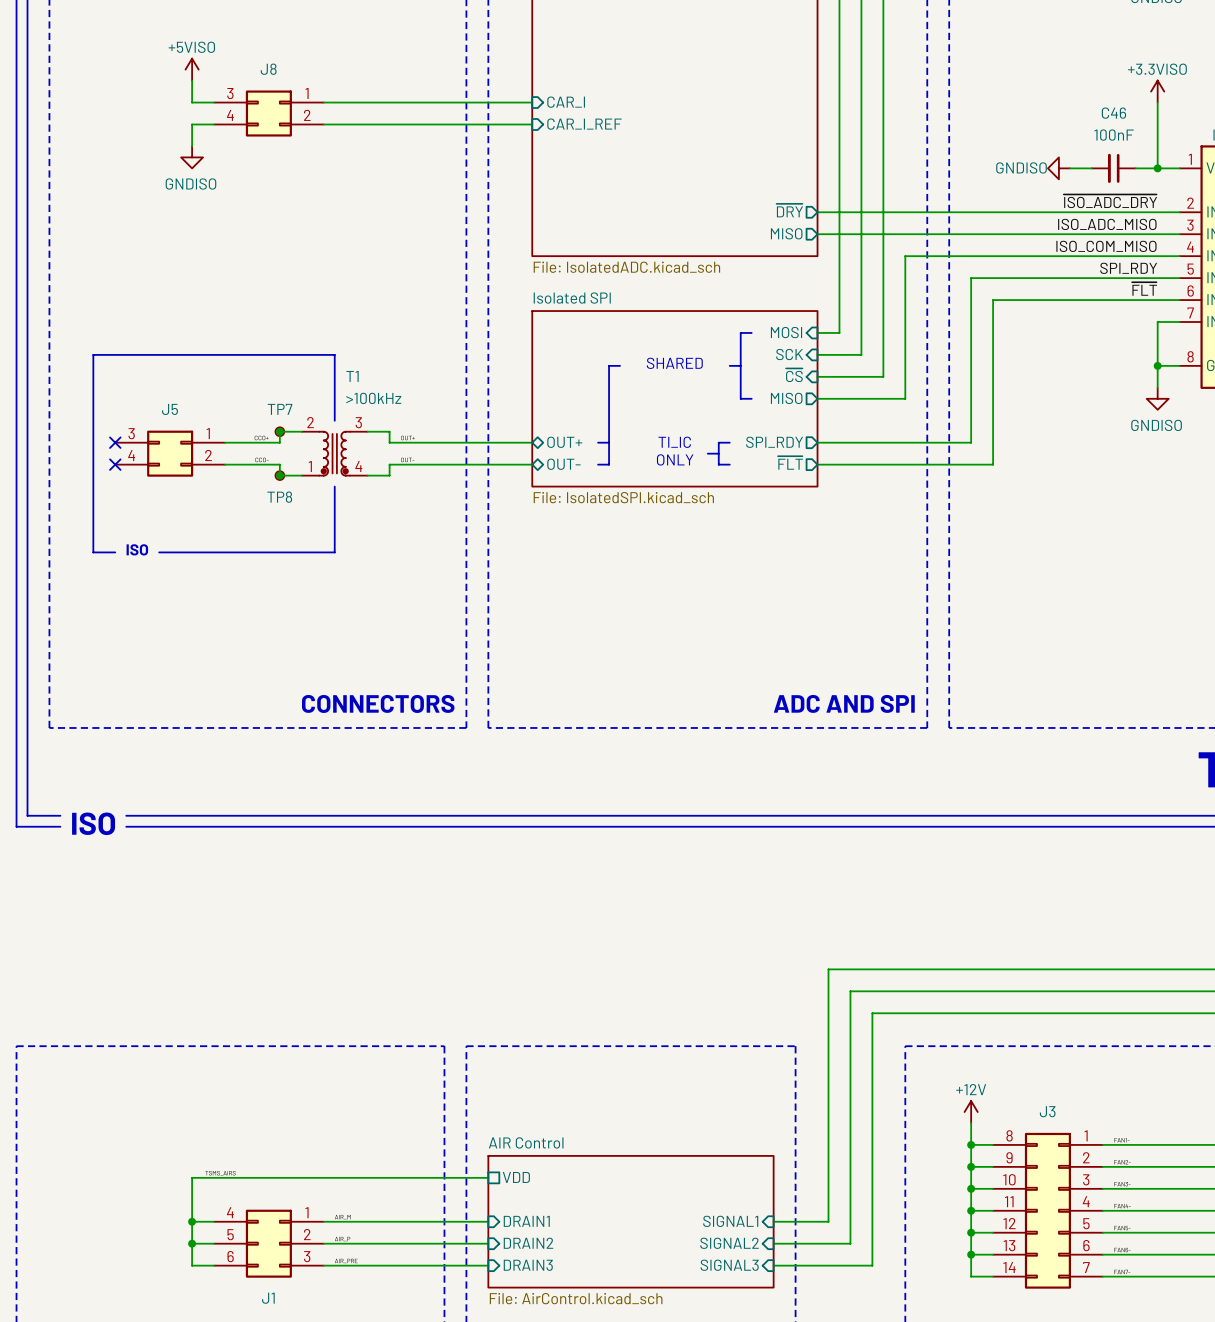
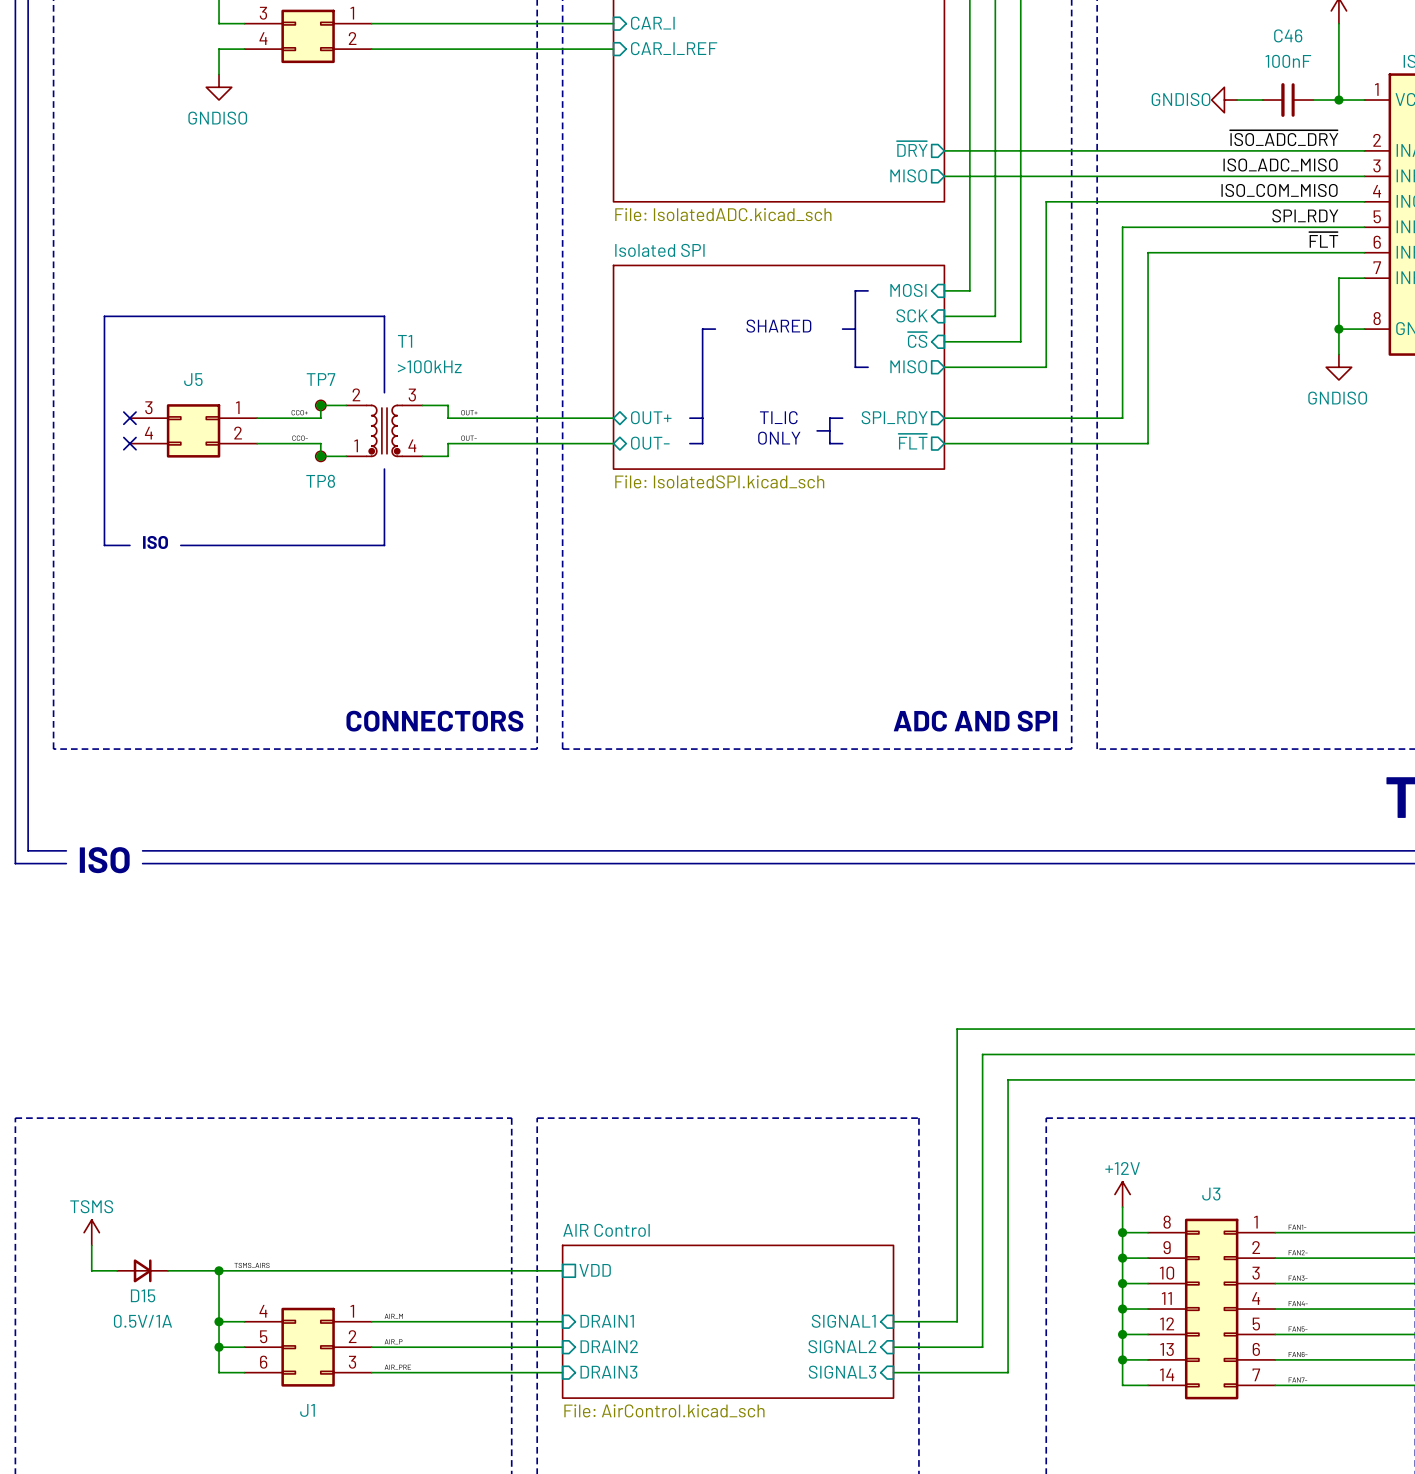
power symbol: none -> TSMS (91, 1232)
wire: none -> (91, 1245) (91, 1270) (117, 1270)
D15: none -> 0.5V/1A (142, 1270)
wire: none -> (168, 1270) (219, 1270)
junction: none -> (219, 1270)

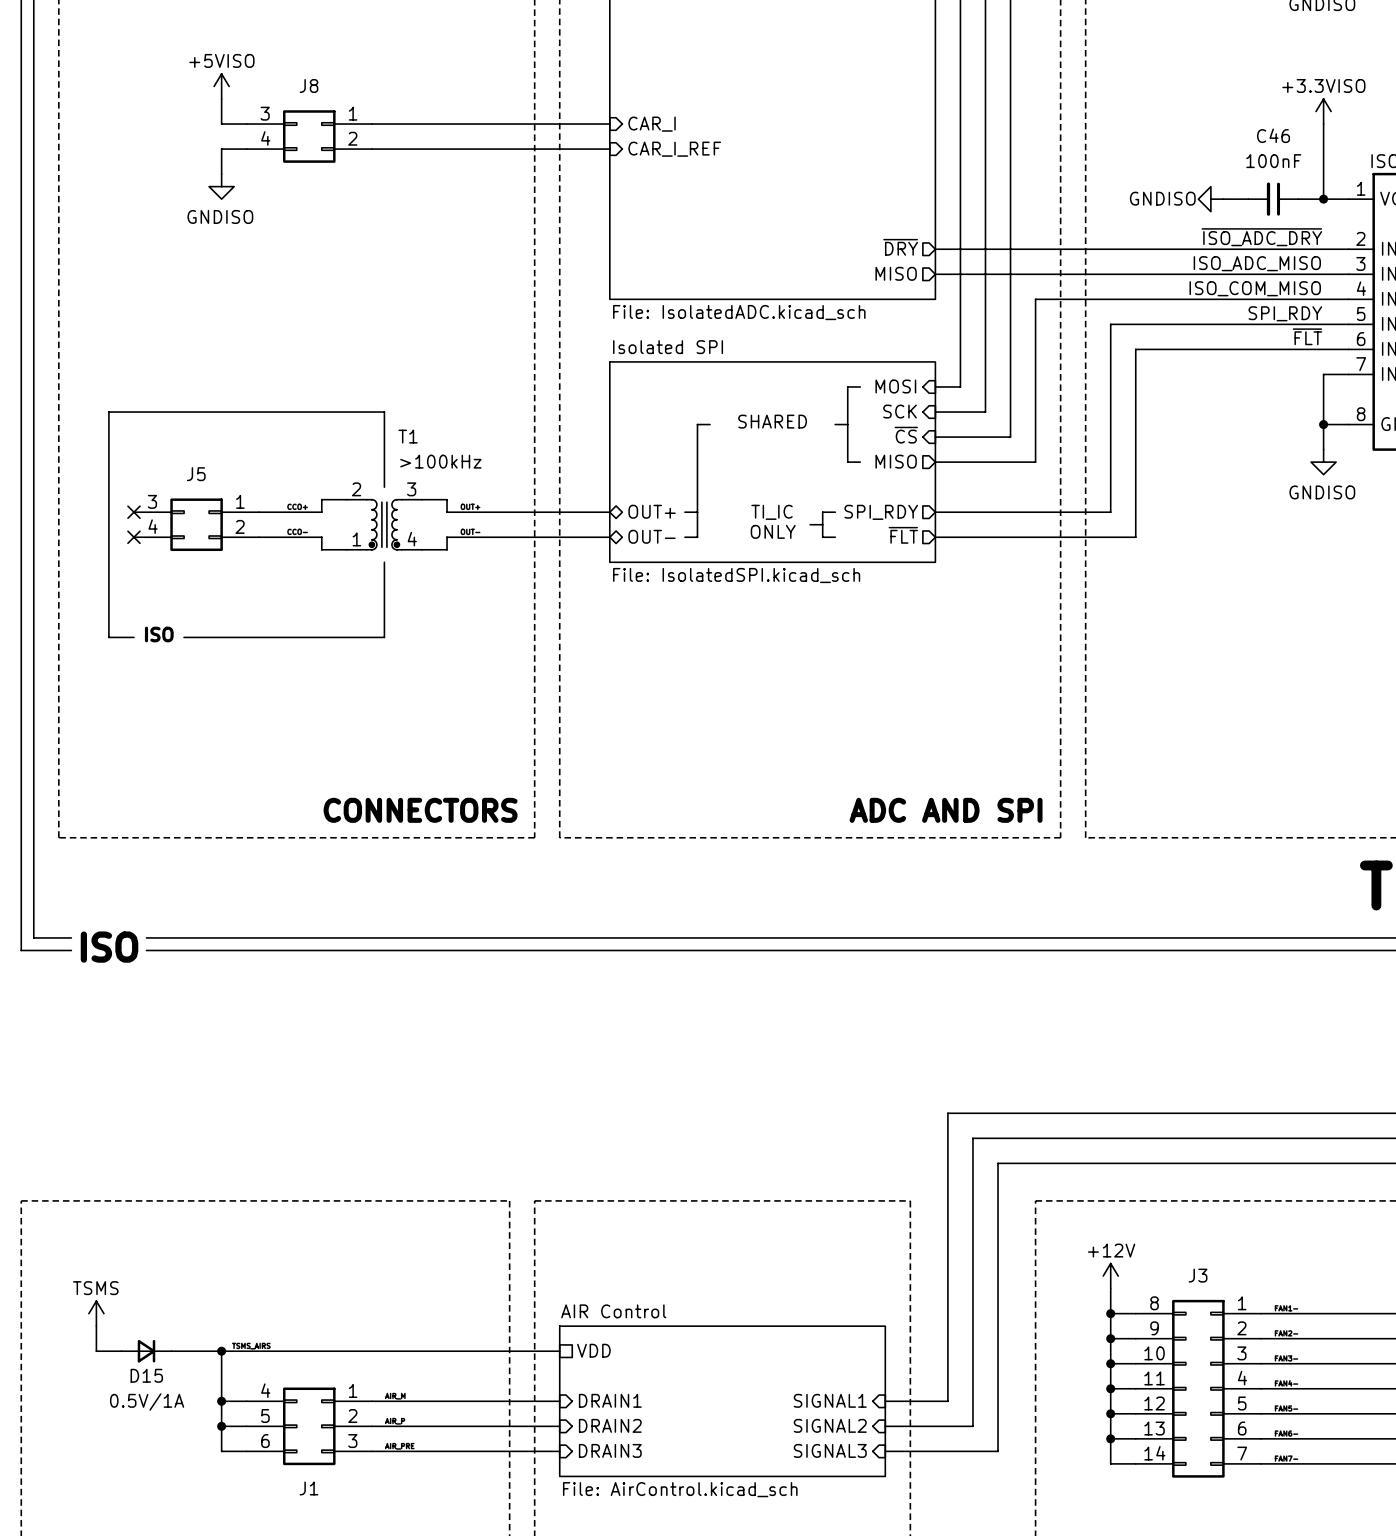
junction: (320, 405) -> none
TP7: (320, 405) -> none
junction: (320, 456) -> none
TP8: (320, 456) -> none

